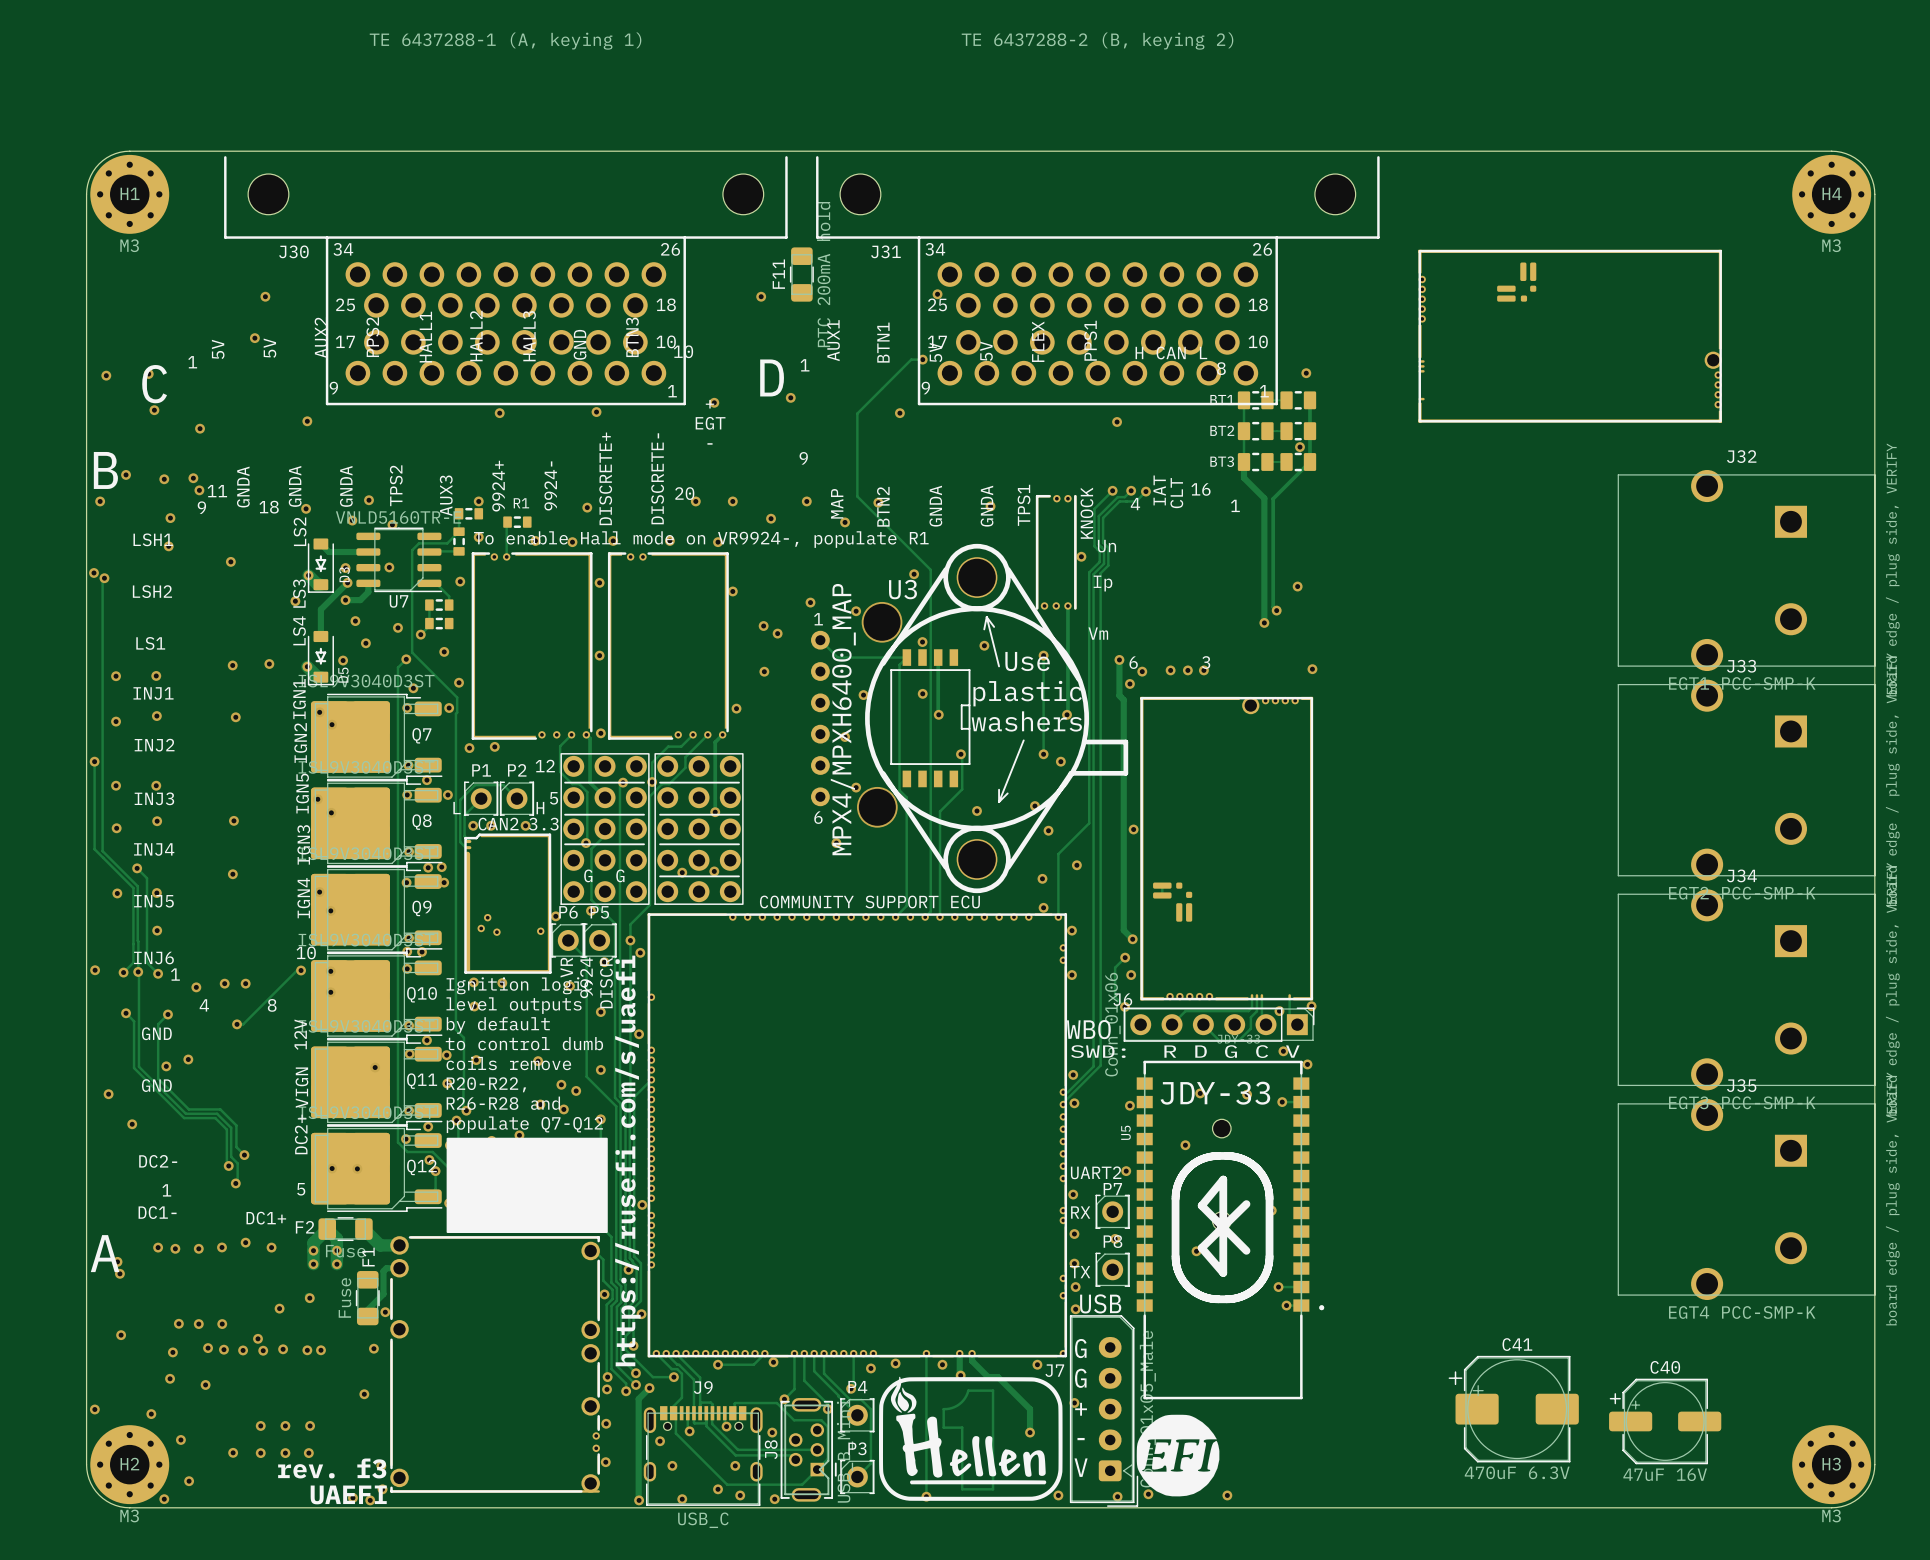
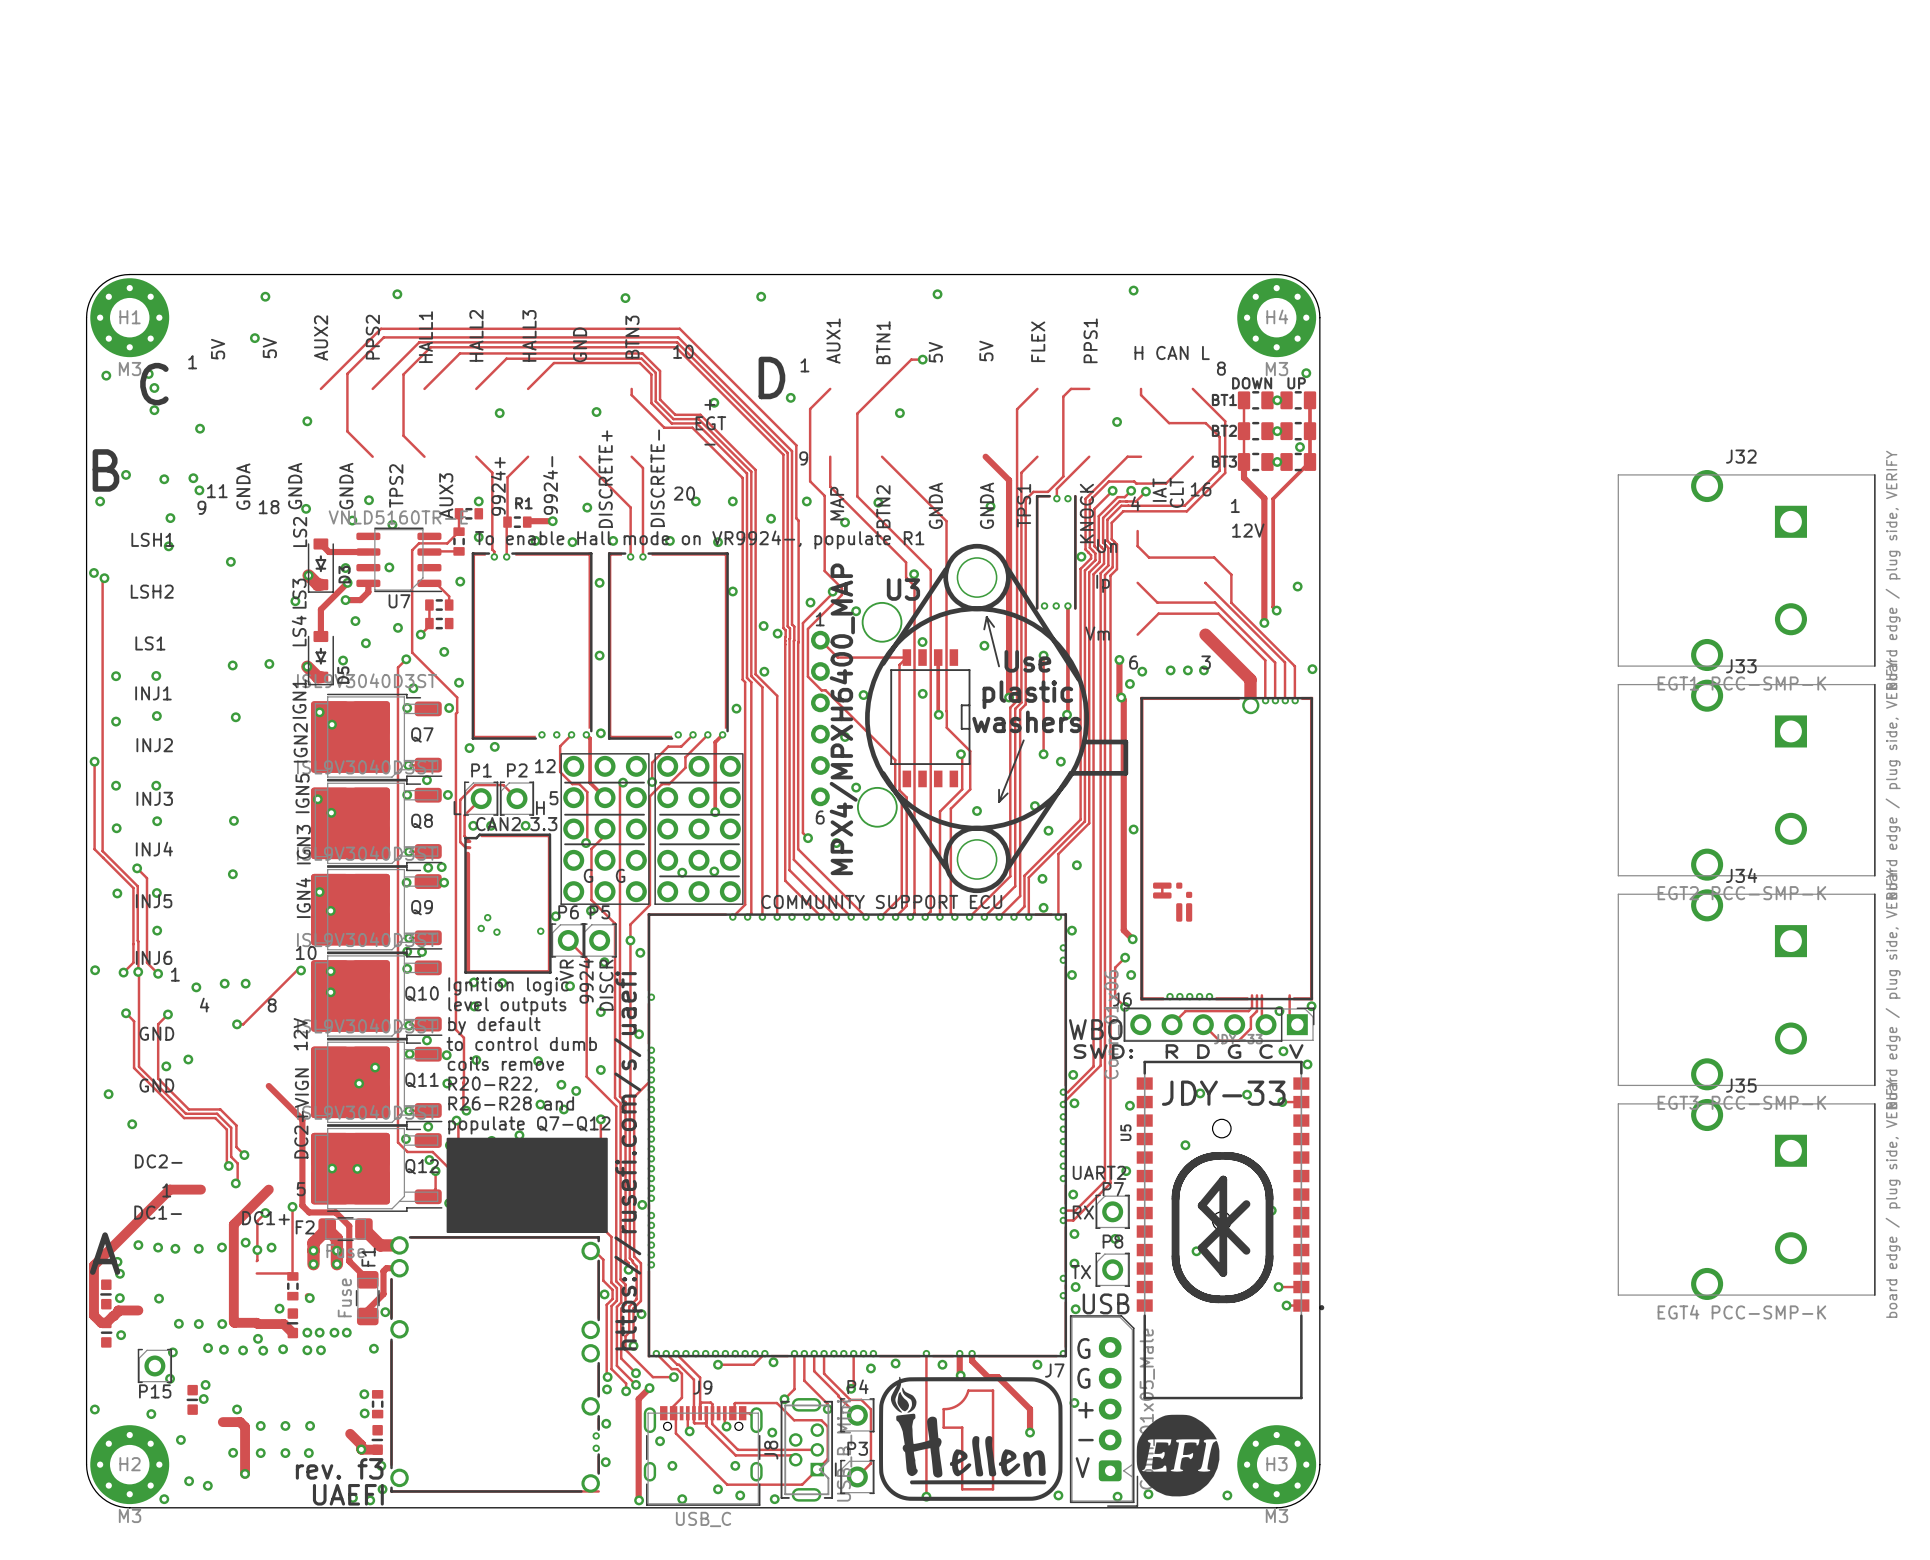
H1 position: (129, 194) -> (129, 317)
H4 position: (1831, 194) -> (1276, 317)
F11: PTC 200mA hold (801, 274) -> none
J30: TE 6437288-1 (A, keying 1) (505, 280) -> none
J31: TE 6437288-2 (B, keying 2) (1097, 280) -> none
via: none -> (1133, 290)
via: none -> (397, 294)
via: none -> (625, 298)
board edge: (86, 317) (87, 184) (93, 171) (99, 163) (111, 155) (124, 151) (1831, 151) (1850, 155) (1862, 163) (1870, 175) (1874, 194) (1874, 1464) (1870, 1483) (1862, 1495) (1854, 1501) (1845, 1505) (1831, 1507) (1276, 1507) -> (86, 317) (88, 303) (99, 287) (115, 276) (129, 274) (1276, 274) (1290, 276) (1307, 287) (1317, 303) (1319, 317) (1319, 1464) (1315, 1483) (1307, 1495) (1290, 1505) (1276, 1507)
part: (1570, 336) -> none
text: none -> DOWN (1252, 383)
text: none -> UP (1296, 383)
via: none -> (154, 387)
track: none -> (320, 388) (381, 328) (679, 328) (796, 445) (796, 518) (798, 520) (798, 849) (866, 917)
track: none -> (372, 388) (419, 342) (677, 342) (787, 452) (789, 870) (836, 917)
track: none -> (424, 388) (459, 353) (642, 353) (660, 370) (660, 399) (675, 414) (700, 414) (755, 470) (755, 674) (777, 695) (777, 917)
track: none -> (476, 388) (506, 358) (641, 358) (655, 372) (655, 401) (673, 419) (698, 419) (751, 471) (751, 676) (762, 687) (762, 917)
track: none -> (528, 388) (553, 363) (639, 363) (651, 374) (651, 403) (671, 423) (696, 423) (746, 473) (746, 677) (751, 682) (751, 913) (747, 917)
track: none -> (631, 388) (631, 395) (664, 427) (692, 427) (742, 478) (745, 904) (732, 917)
track: none -> (830, 388) (810, 409) (810, 481) (824, 495) (824, 571) (841, 588) (841, 594) (807, 628) (807, 676) (821, 690) (825, 690) (895, 759) (895, 792) (901, 798) (901, 896) (880, 917)
track: none -> (1037, 388) (1017, 409) (1017, 700) (1010, 707) (1010, 876) (969, 917)
track: none -> (1089, 388) (1071, 388) (1063, 396) (1063, 476) (1047, 491) (1033, 491) (1025, 499) (1025, 704) (1020, 709) (1020, 896) (999, 917)
track: none -> (1141, 388) (1141, 395) (1169, 423) (1205, 423) (1219, 437) (1219, 470) (1184, 505) (1121, 505) (1107, 519) (1107, 540) (1110, 543)
track: none -> (1192, 388) (1225, 421) (1225, 473) (1186, 511) (1123, 511) (1111, 522) (1111, 539) (1114, 542)
via: none -> (1277, 400)
via: none -> (1277, 431)
track: none -> (372, 456) (347, 431) (347, 373) (383, 337) (678, 337) (792, 451) (793, 859) (851, 917)
track: none -> (424, 456) (403, 435) (403, 374) (430, 347) (675, 347) (783, 454) (783, 628) (785, 630) (785, 880) (821, 917)
track: none -> (476, 456) (492, 472) (492, 549) (494, 556)
track: none -> (528, 456) (507, 477) (507, 522)
track: none -> (579, 456) (630, 507) (630, 556)
track: none -> (631, 456) (642, 468) (642, 556)
track: none -> (830, 456) (830, 486) (906, 562) (906, 577) (914, 585) (914, 912) (910, 917)
track: none -> (882, 456) (946, 521) (946, 727) (970, 751) (970, 789) (950, 808) (950, 913) (954, 917)
track: none -> (985, 456) (1009, 480) (1009, 697)
track: none -> (1037, 456) (1021, 472) (1021, 702) (1015, 708) (1015, 886) (984, 917)
track: none -> (1089, 456) (1056, 489) (1056, 498)
track: none -> (1141, 456) (1127, 456) (1085, 498) (1085, 549) (1088, 552)
track: none -> (1192, 456) (1166, 483) (1108, 481) (1089, 500) (1089, 547) (1093, 550)
via: none -> (1277, 461)
track: none -> (528, 521) (552, 521)
via: none -> (552, 521)
text: none -> 12V (1248, 530)
track: none -> (1137, 531) (1137, 546) (1149, 557) (1214, 557) (1231, 574) (1231, 602) (1294, 666) (1294, 700)
track: none -> (1114, 542) (1116, 544) (1116, 569) (1110, 575) (1110, 1183) (1073, 1220) (1063, 1220)
track: none -> (1110, 543) (1112, 546) (1112, 567) (1104, 575) (1104, 1181) (1075, 1210) (1063, 1210)
track: none -> (1093, 551) (1095, 553) (1095, 560) (1084, 570) (1084, 821) (1028, 877) (1028, 917)
track: none -> (1088, 552) (1091, 558) (1080, 568) (1080, 819) (1024, 875) (1024, 906) (1014, 917)
track: none -> (1137, 582) (1157, 602) (1215, 602) (1275, 662) (1275, 700)
track: none -> (1205, 582) (1285, 662) (1285, 700)
track: none -> (832, 591) (802, 623) (802, 833) (808, 838)
via: none -> (832, 591)
track: none -> (1137, 634) (1158, 613) (1218, 613) (1265, 660) (1265, 700)
track: none -> (1205, 634) (1250, 679) (1250, 705)
via: none -> (1009, 697)
via: none -> (1121, 697)
via: none -> (808, 838)
via: none -> (359, 1083)
track: none -> (268, 1086) (302, 1119) (302, 1205) (309, 1212) (335, 1212) (349, 1226) (349, 1261) (367, 1279)
track: none -> (200, 1189) (169, 1189) (93, 1265) (93, 1315) (101, 1322) (106, 1322) (118, 1310) (138, 1310)
track: none -> (268, 1189) (233, 1224) (233, 1322) (283, 1324) (292, 1333)
track: none -> (292, 1206) (292, 1276)
via: none -> (292, 1206)
track: none -> (265, 1213) (257, 1221) (256, 1261)
via: none -> (265, 1213)
via: none -> (138, 1245)
via: none -> (257, 1250)
track: none -> (256, 1273) (289, 1273) (292, 1276)
part: none -> (292, 1286)
part: none -> (106, 1294)
via: none -> (119, 1298)
via: none -> (159, 1298)
part: none -> (292, 1323)
part: none -> (106, 1332)
via: none -> (307, 1332)
via: none -> (319, 1332)
via: none -> (334, 1332)
via: none -> (346, 1332)
P15: none -> (154, 1365)
part: none -> (192, 1399)
via: none -> (203, 1399)
part: none -> (377, 1404)
via: none -> (237, 1409)
C41: 470uF 6.3V (1513, 1409) -> none
via: none -> (364, 1413)
C40: 47uF 16V (1665, 1421) -> none
track: none -> (222, 1422) (240, 1422) (245, 1427) (245, 1473)
track: none -> (350, 1433) (361, 1444) (361, 1449) (377, 1449)
part: none -> (377, 1439)
via: none -> (361, 1449)
H3 position: (1831, 1464) -> (1276, 1464)
via: none -> (245, 1473)
via: none -> (207, 1485)

